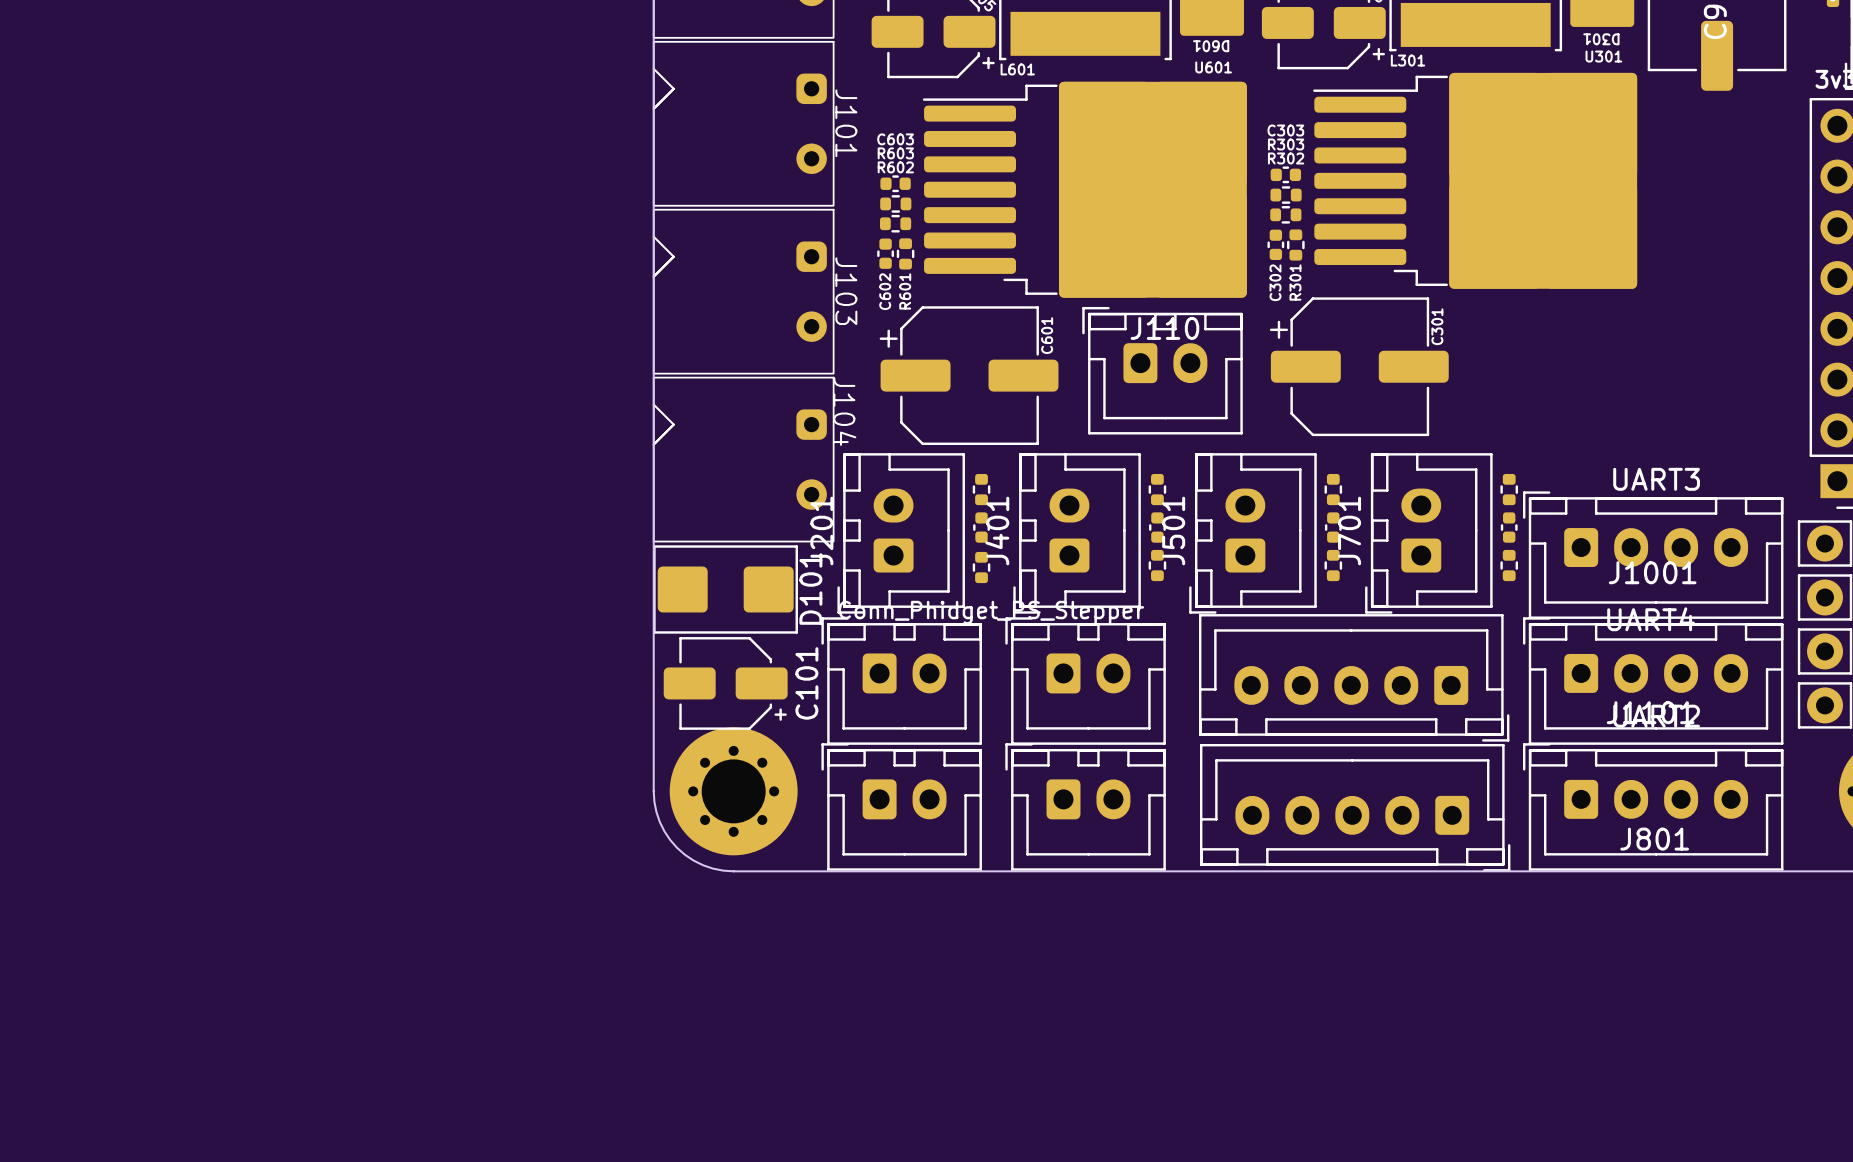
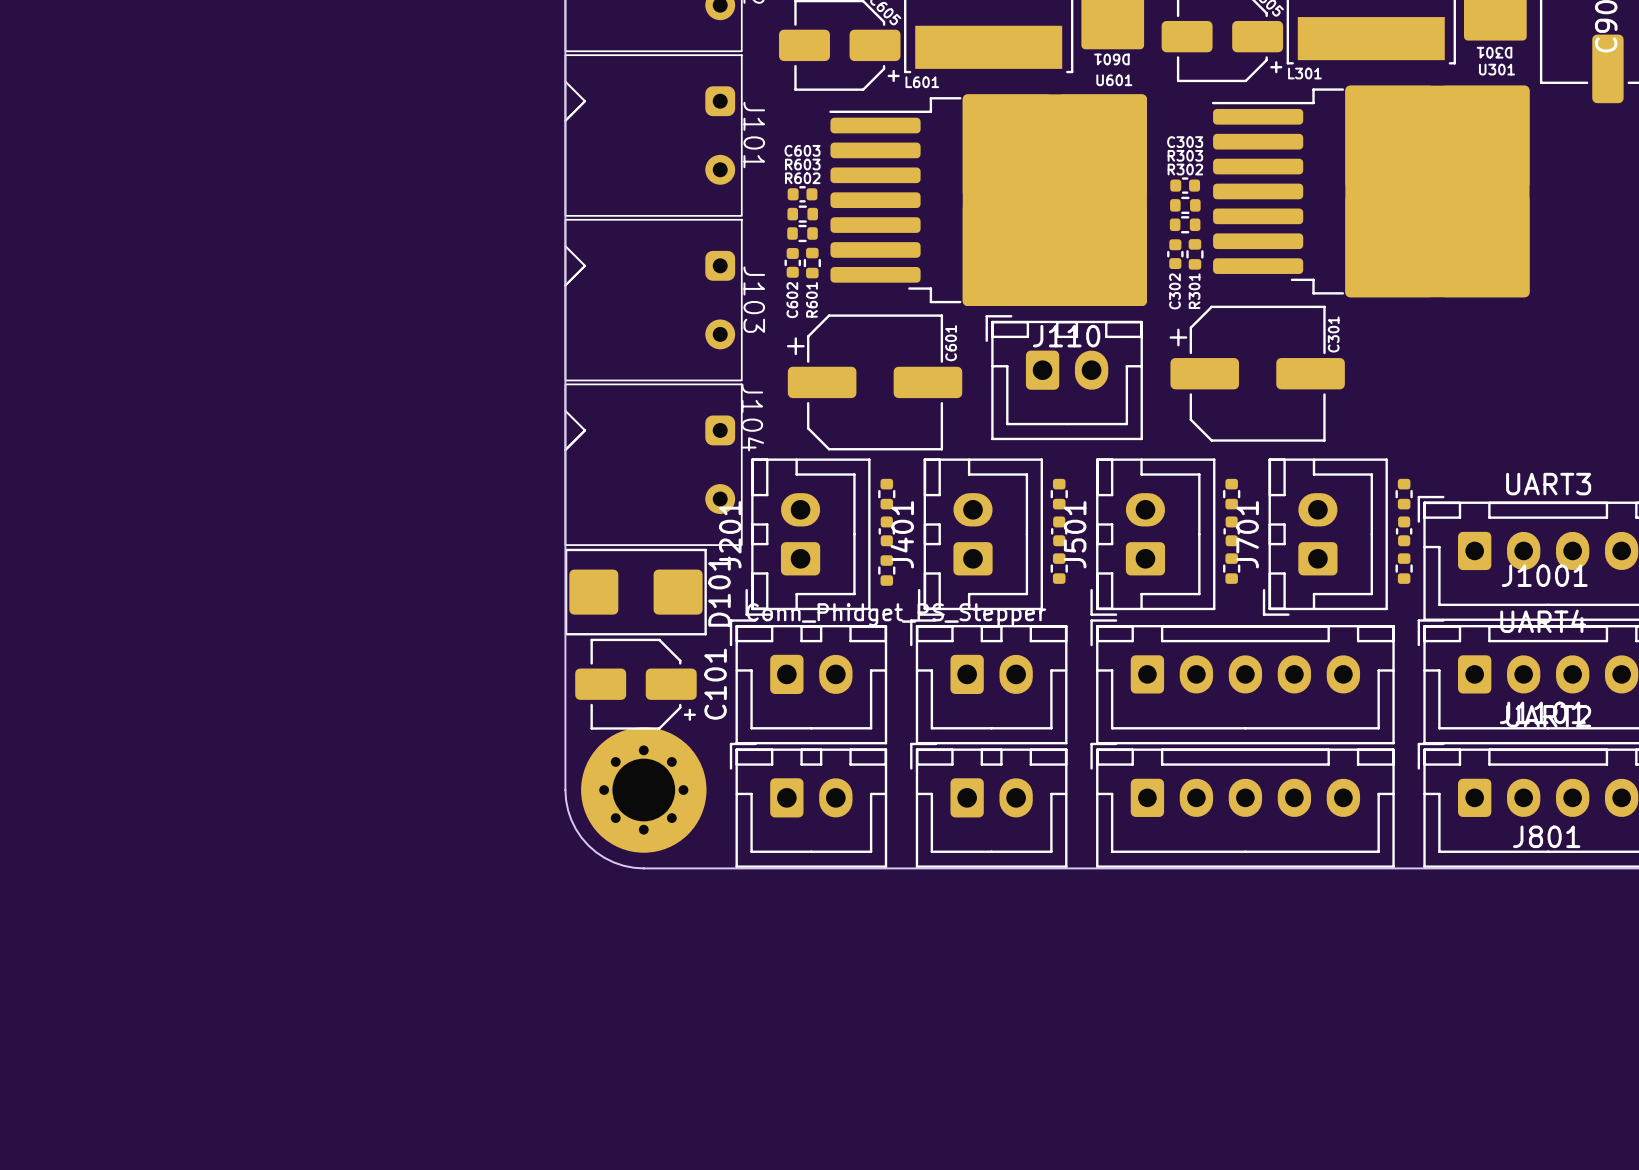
part rotation: 0° (1354, 677) -> 180° (1242, 681)
part rotation: 0° (1355, 807) -> 180° (1242, 805)

